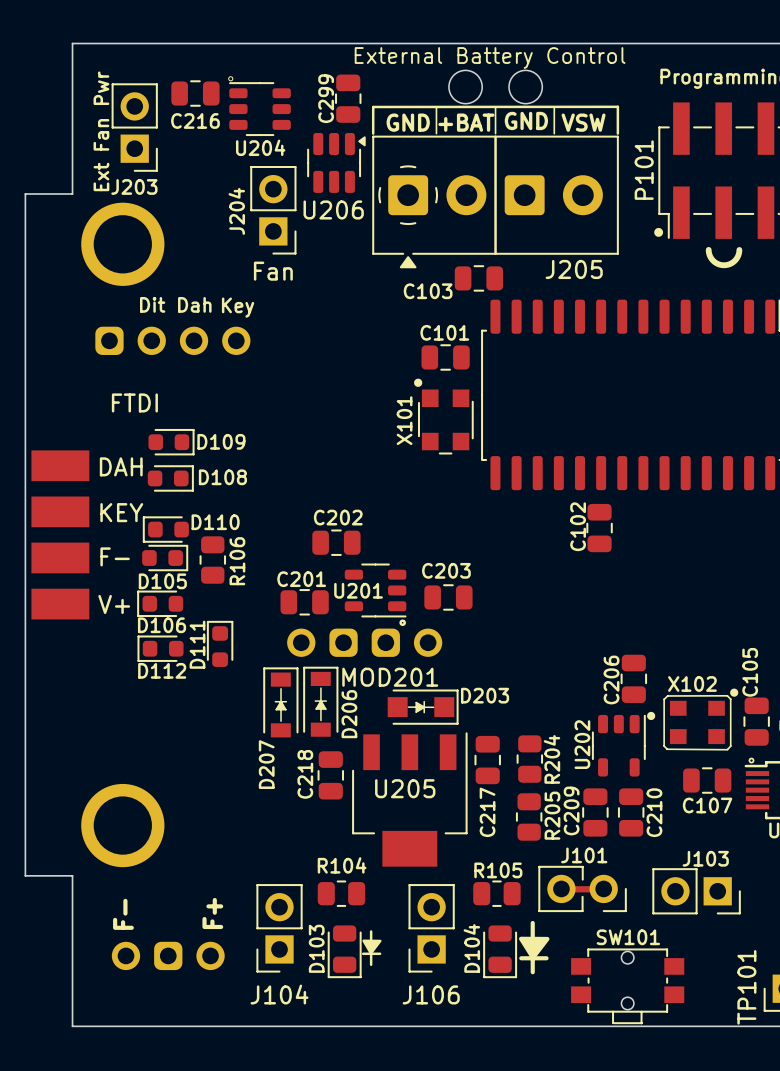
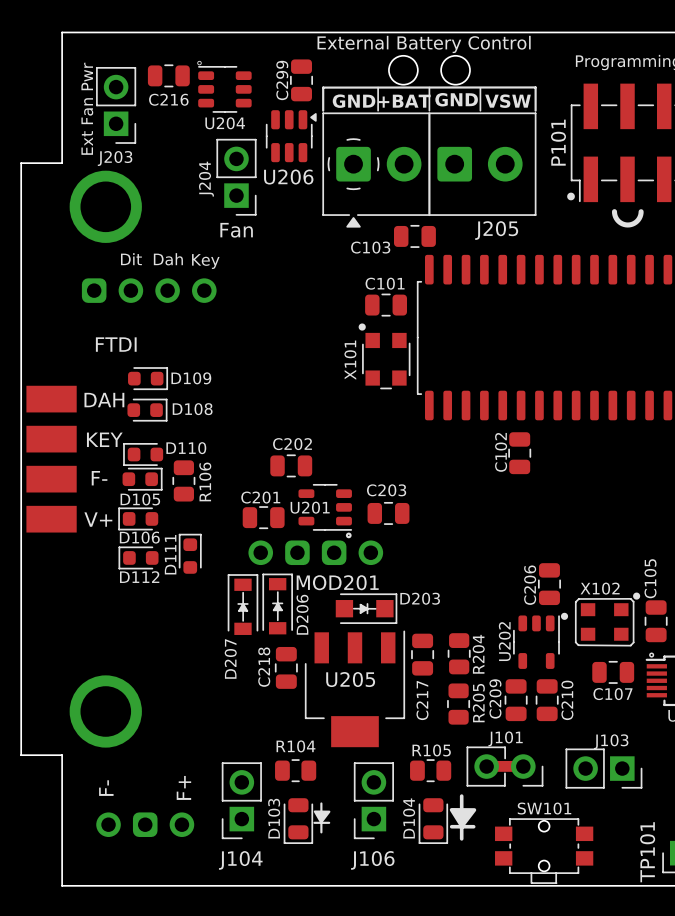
J101 footprint: [538, 865, 627, 913] -> [466, 746, 544, 787]

